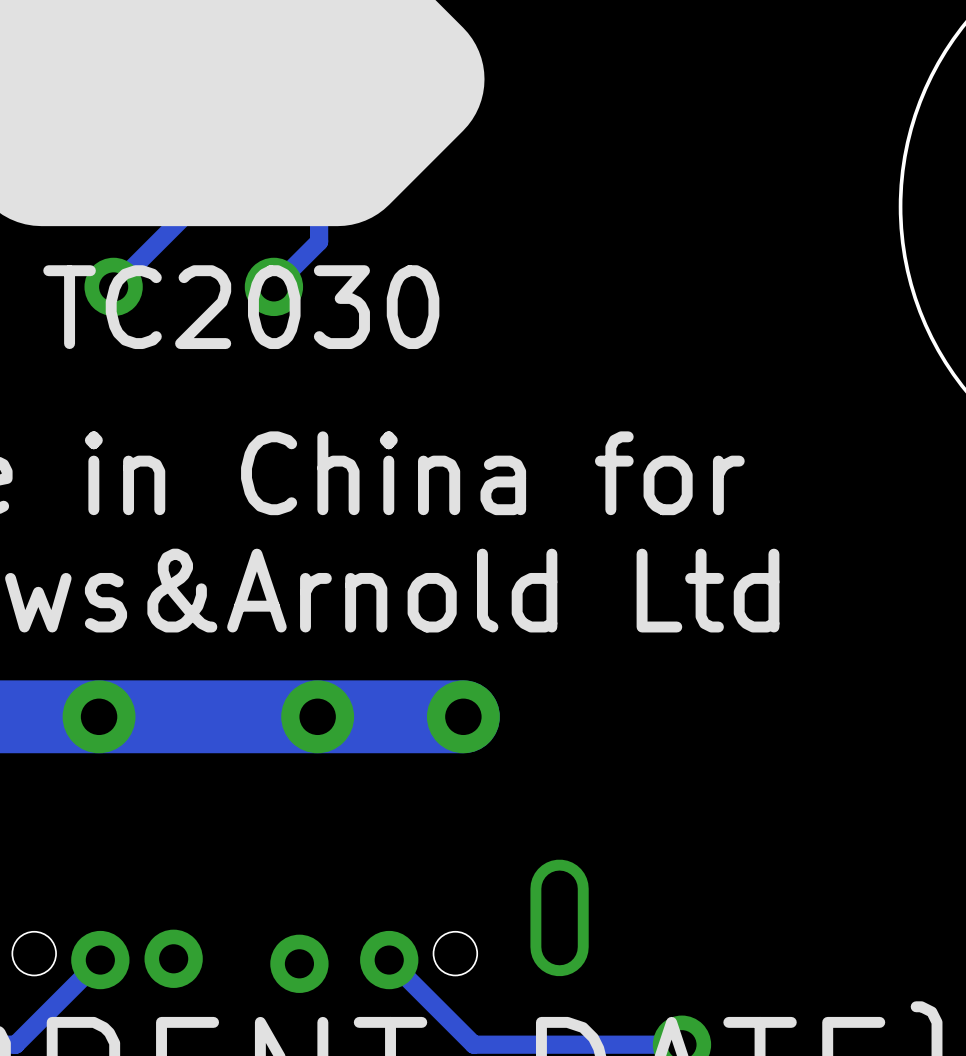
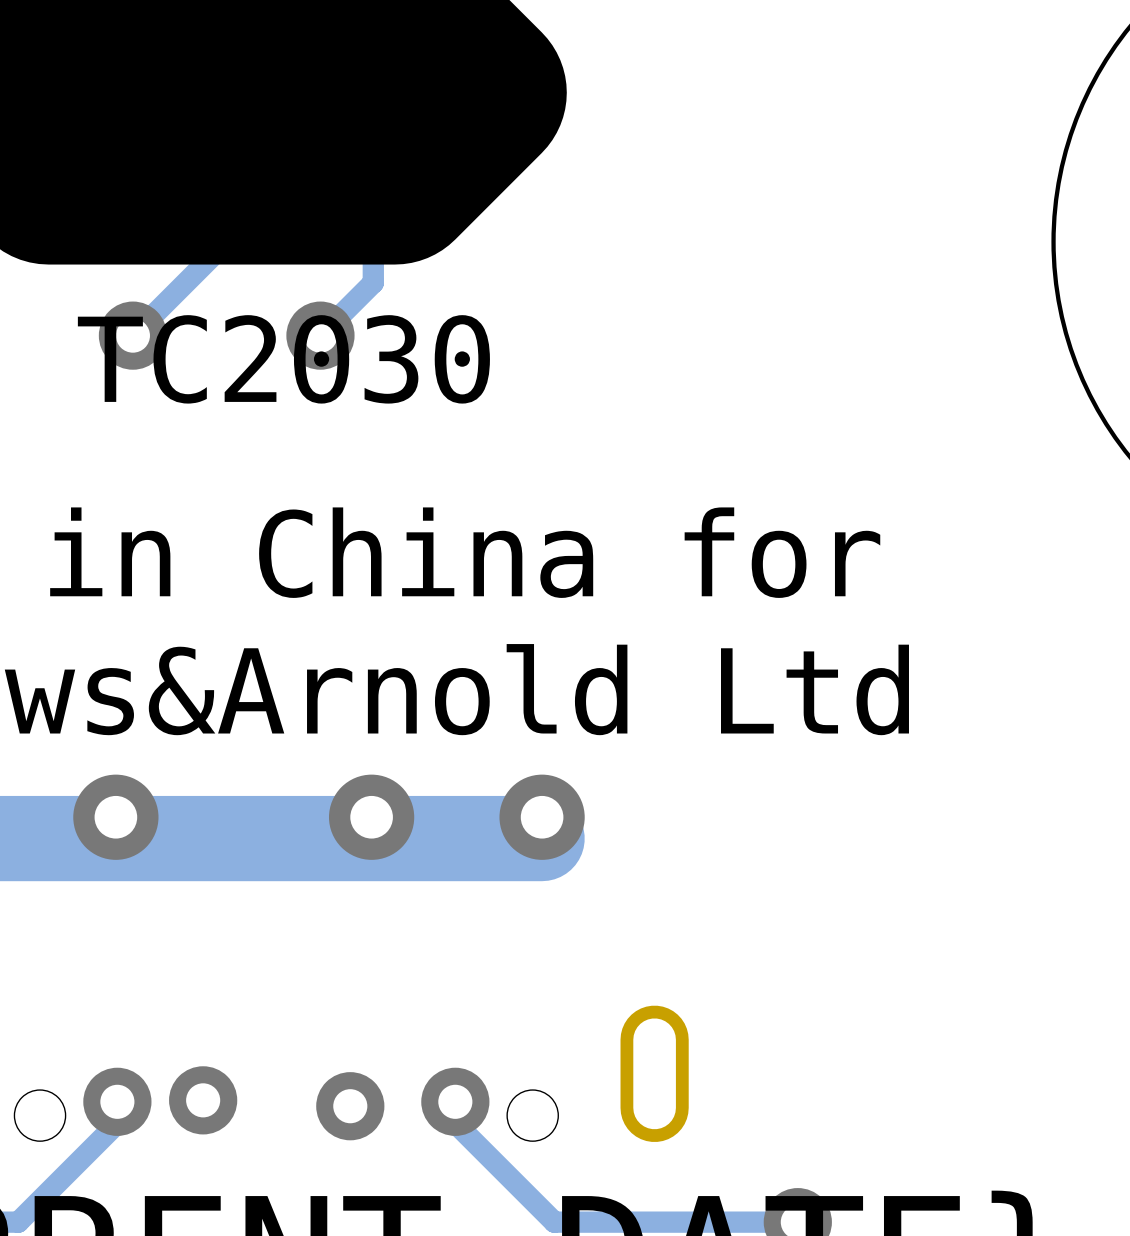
via position: (99, 716) -> (115, 817)
via position: (317, 716) -> (371, 817)
via position: (463, 716) -> (542, 817)
via position: (173, 958) -> (203, 1100)
via position: (100, 960) -> (117, 1101)
via position: (389, 960) -> (455, 1101)
via position: (299, 963) -> (350, 1106)

